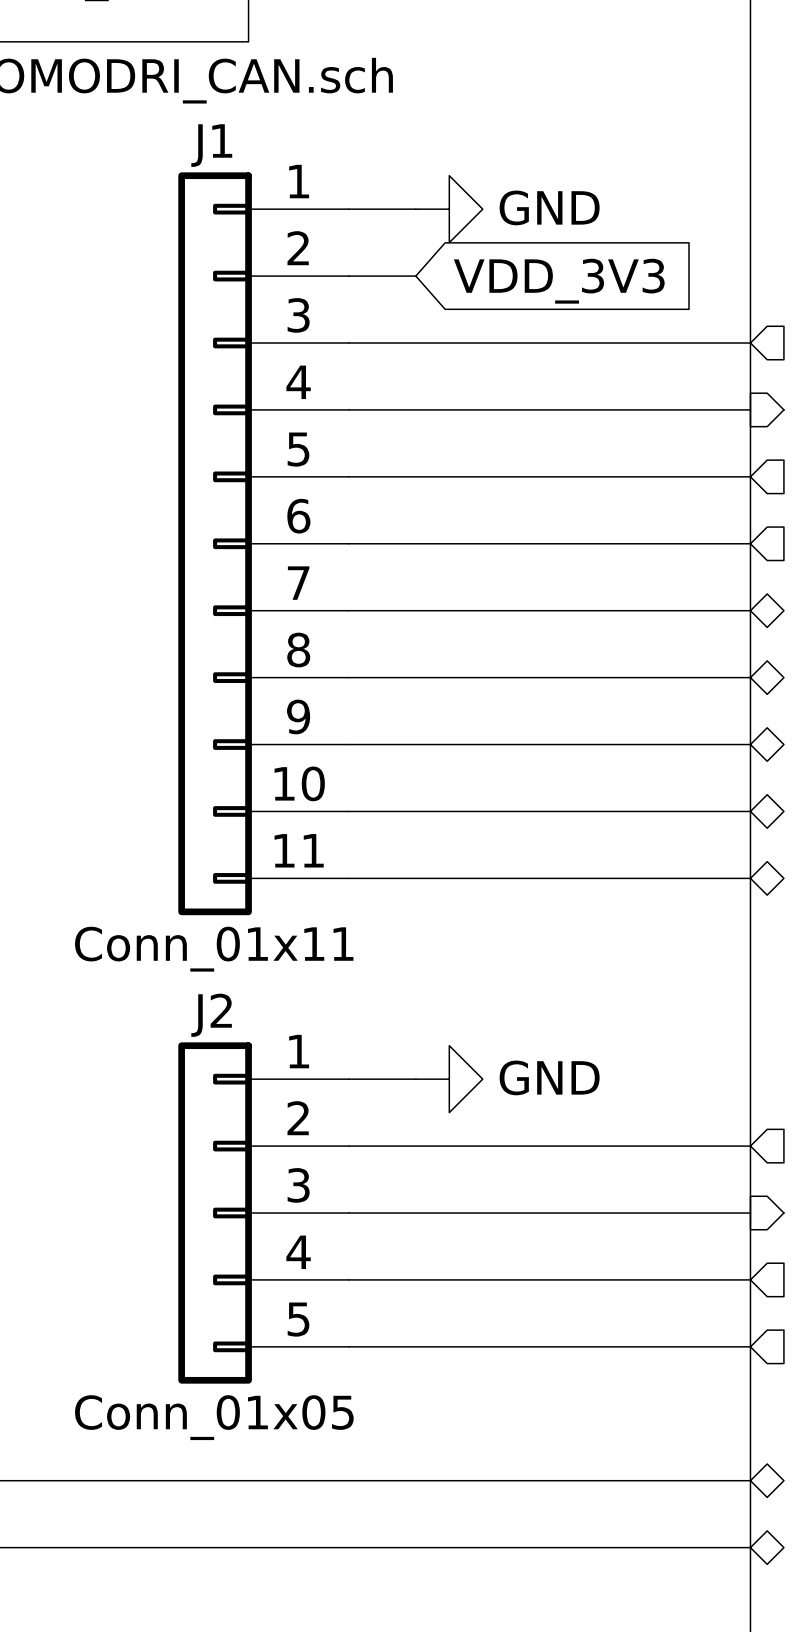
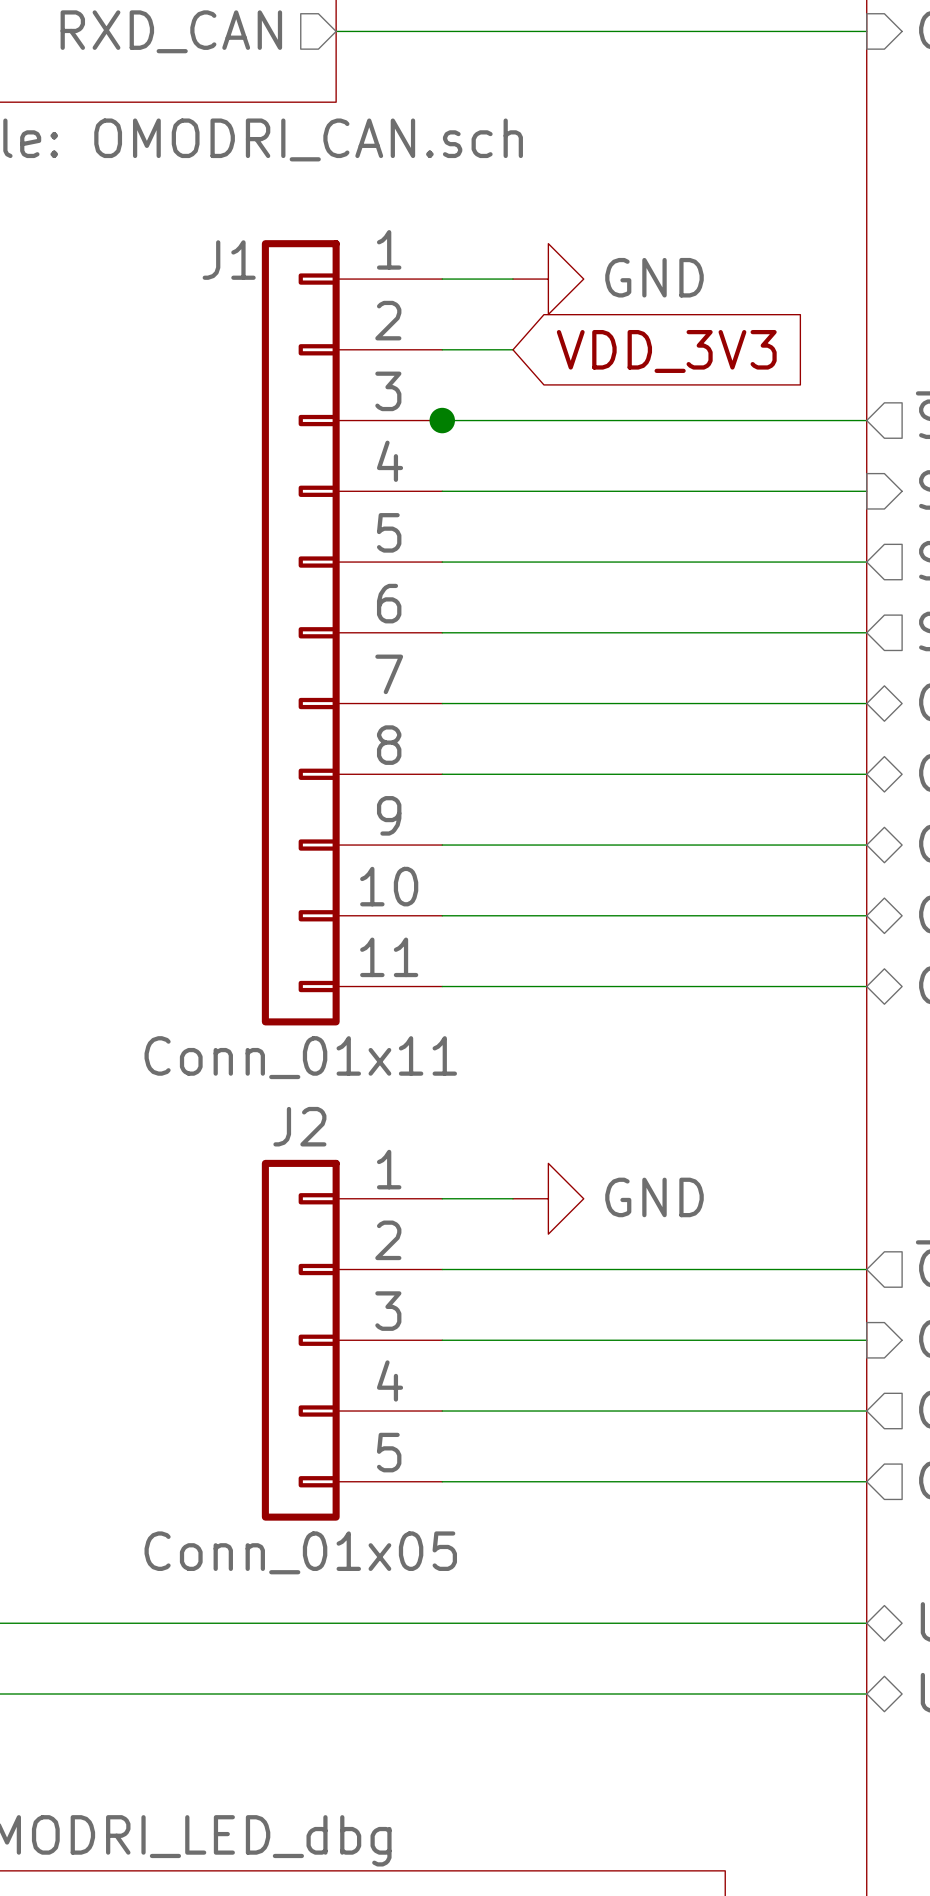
J1 name position: J1 (211, 145) -> J1 (229, 260)
junction: none -> (442, 420)

